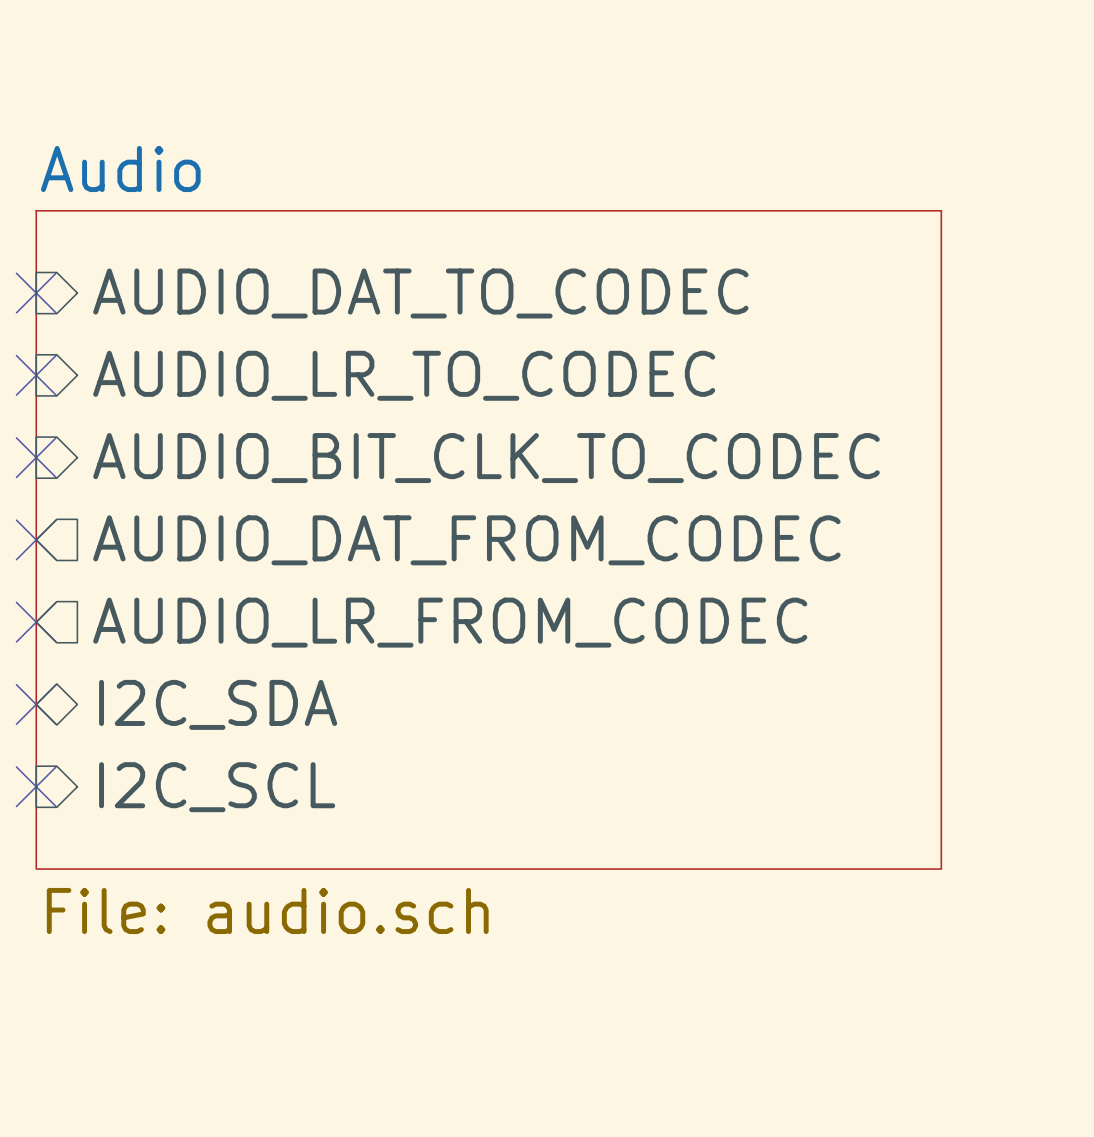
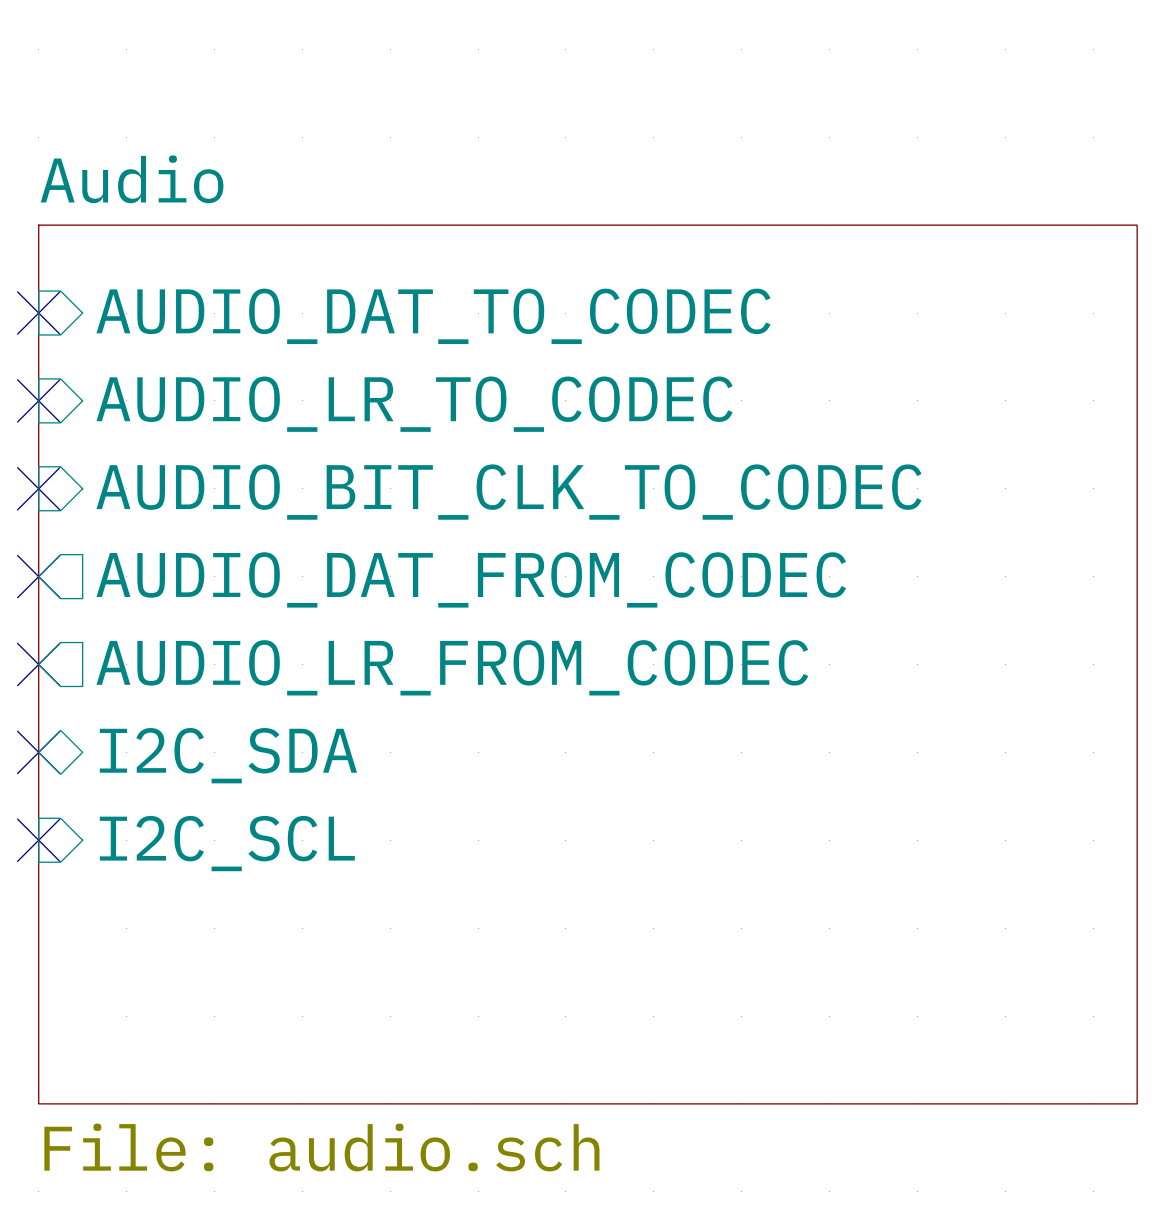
sheet Audio: File: audio.sch (488, 539) -> none
sheet Audio: none -> File: audio.sch (587, 664)

